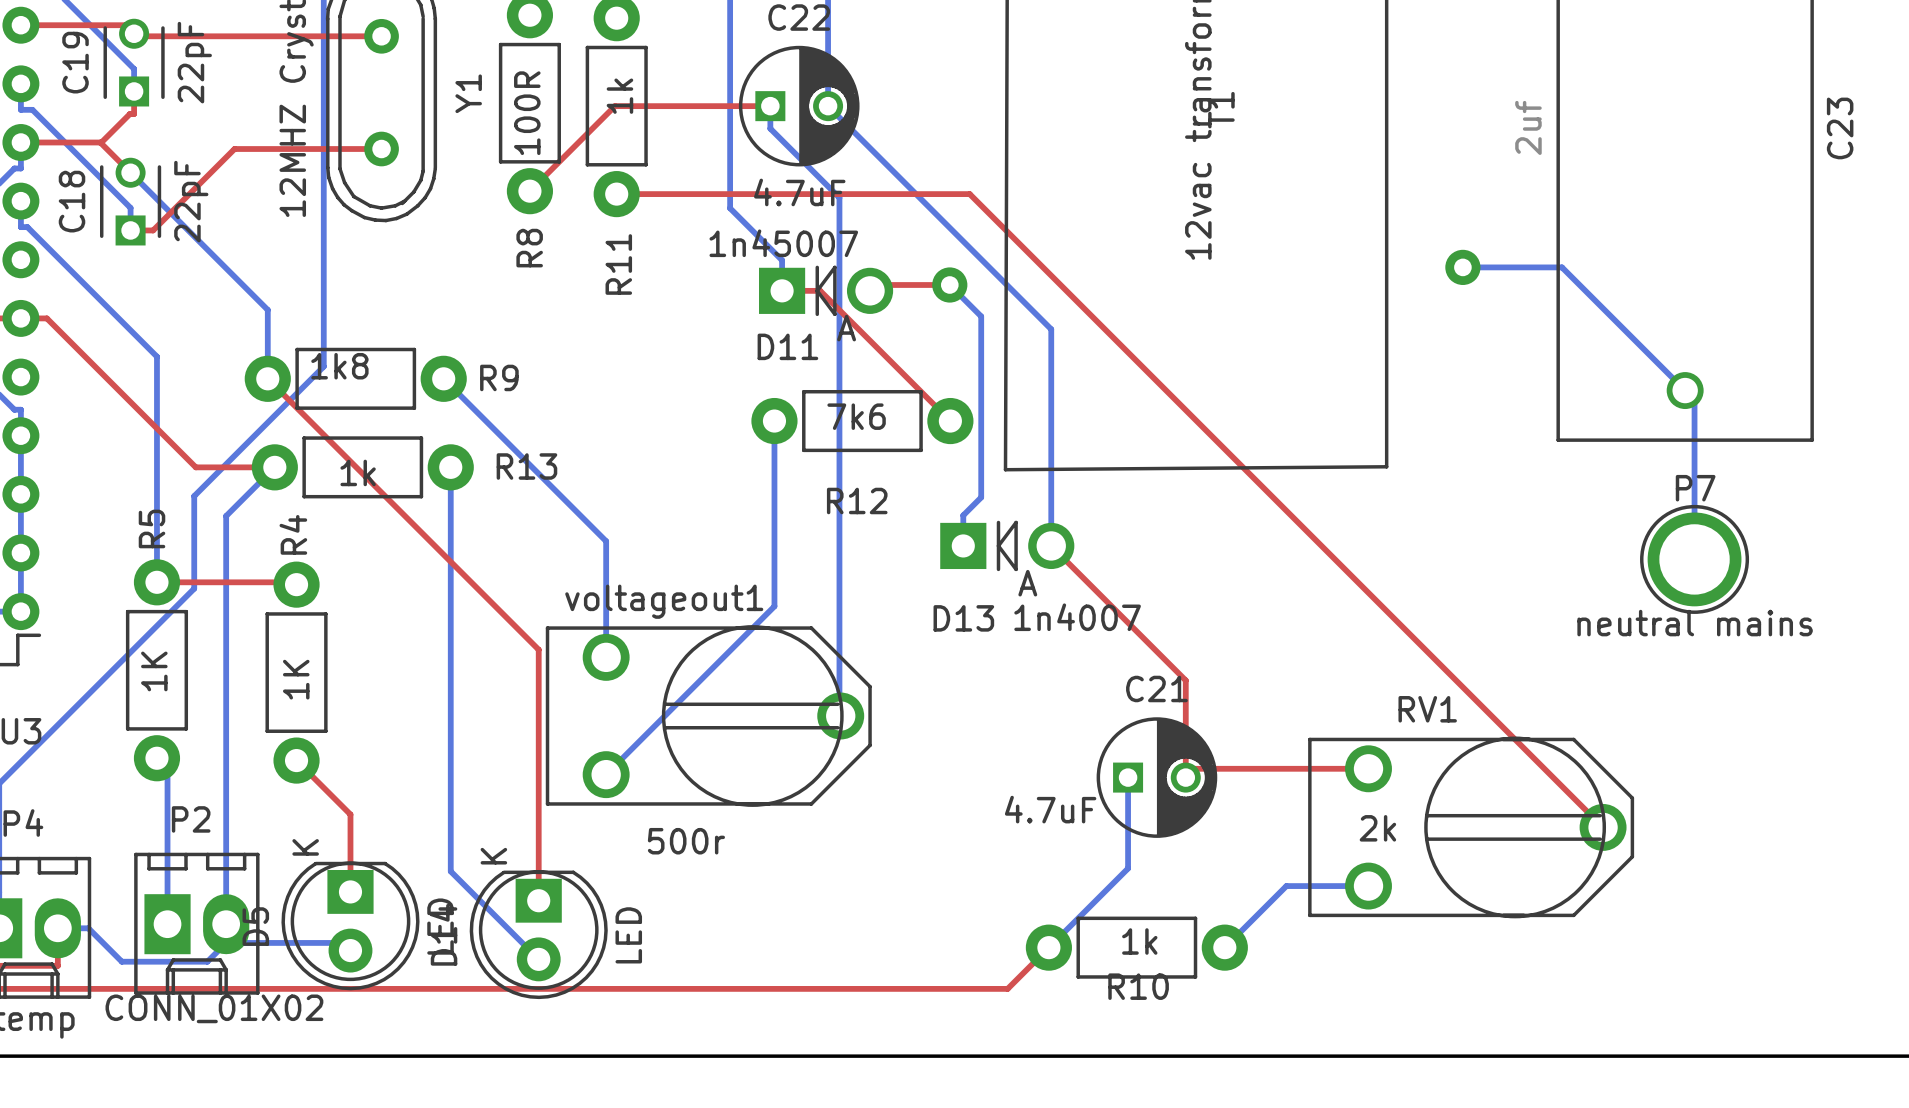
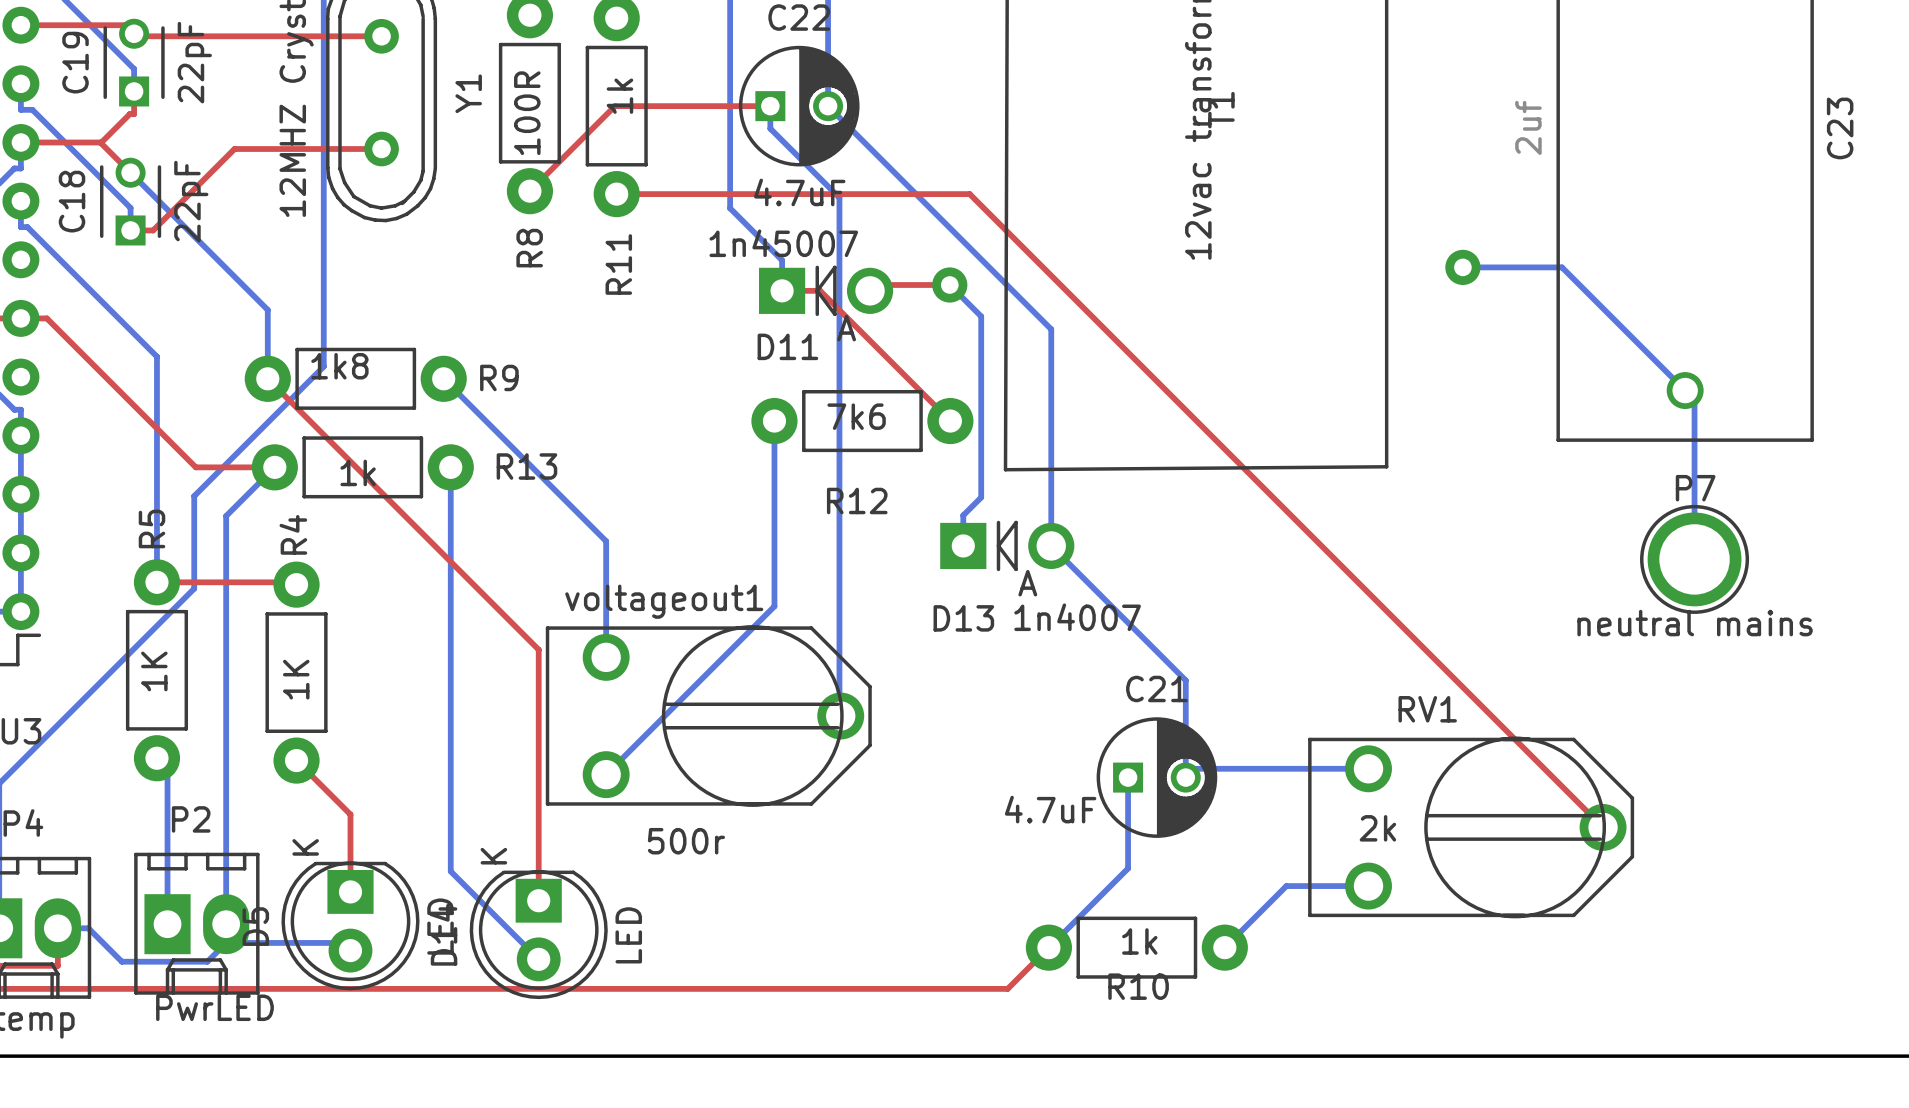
bottom track: none -> (1051, 545) (1185, 680) (1185, 777)
top track: (1051, 545) (1185, 680) (1185, 777) -> none
bottom track: none -> (1185, 768) (1368, 768)
top track: (1185, 768) (1368, 768) -> none
P2 value: CONN_01X02 (214, 1008) -> PwrLED (214, 1007)

